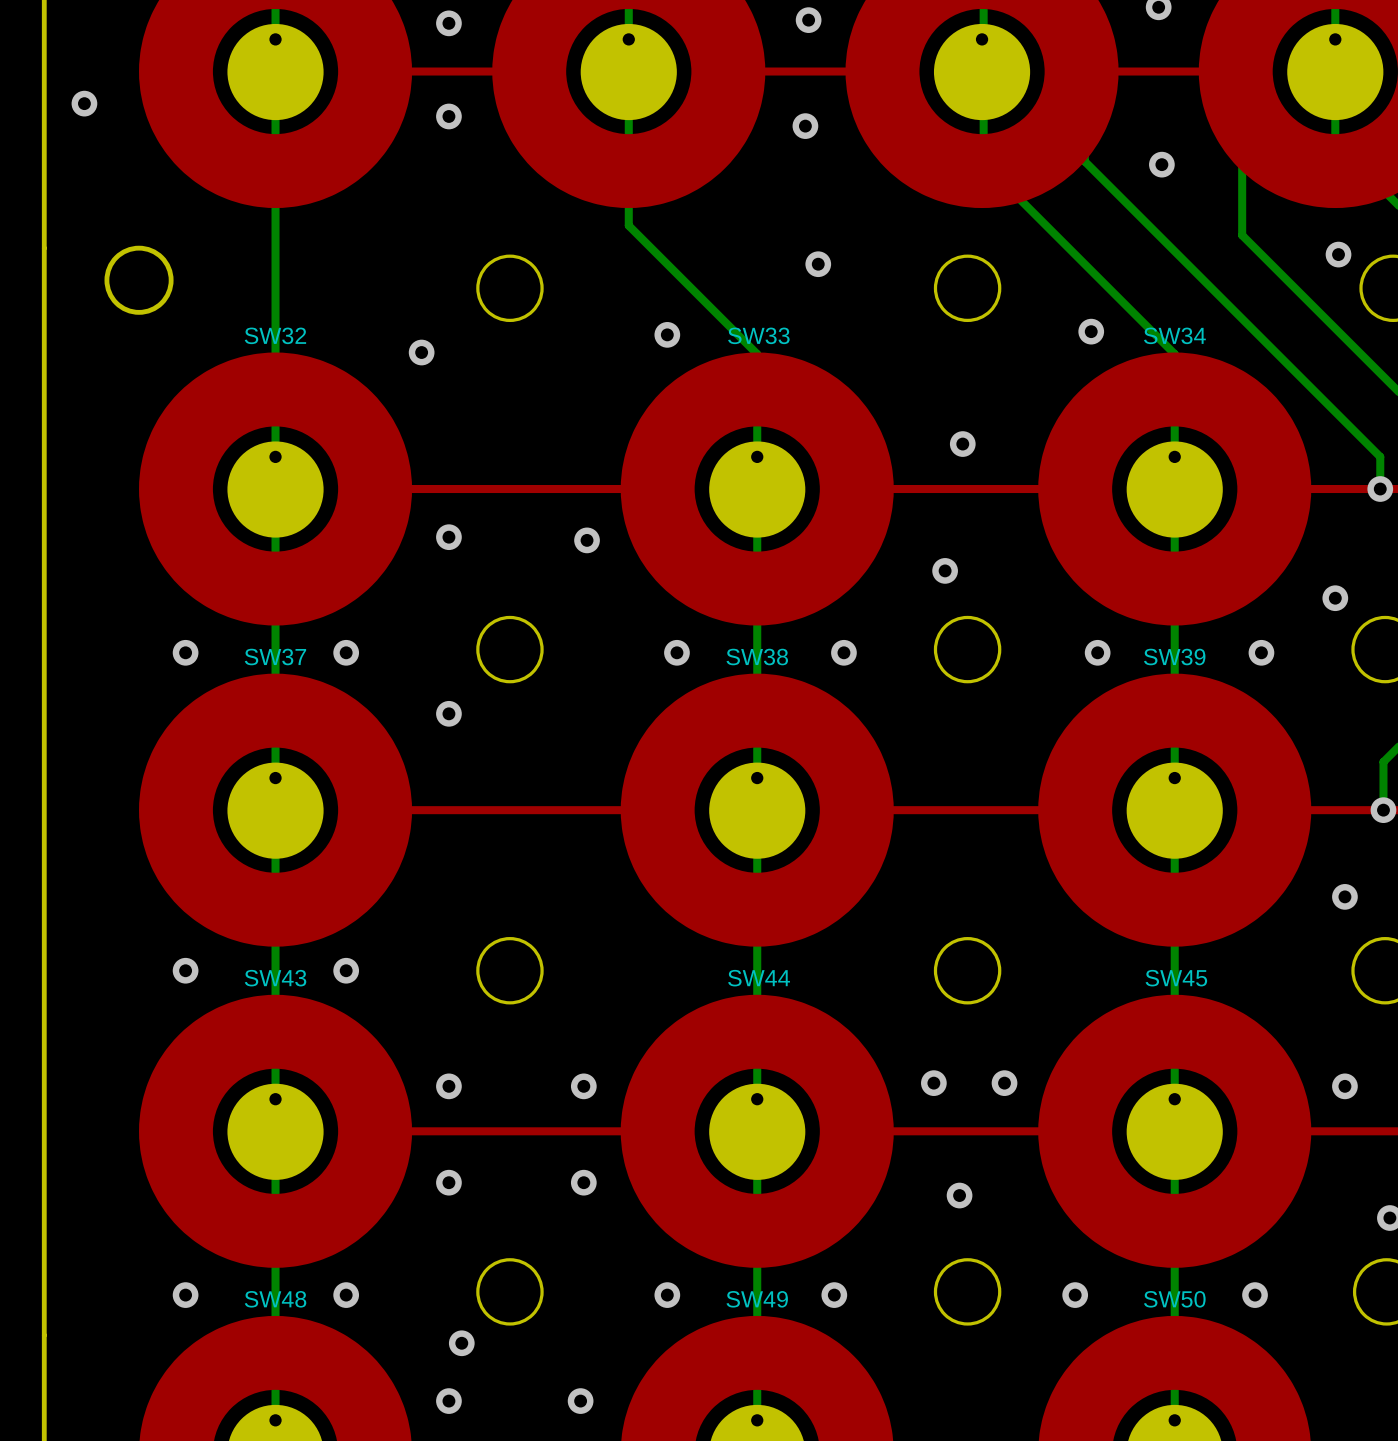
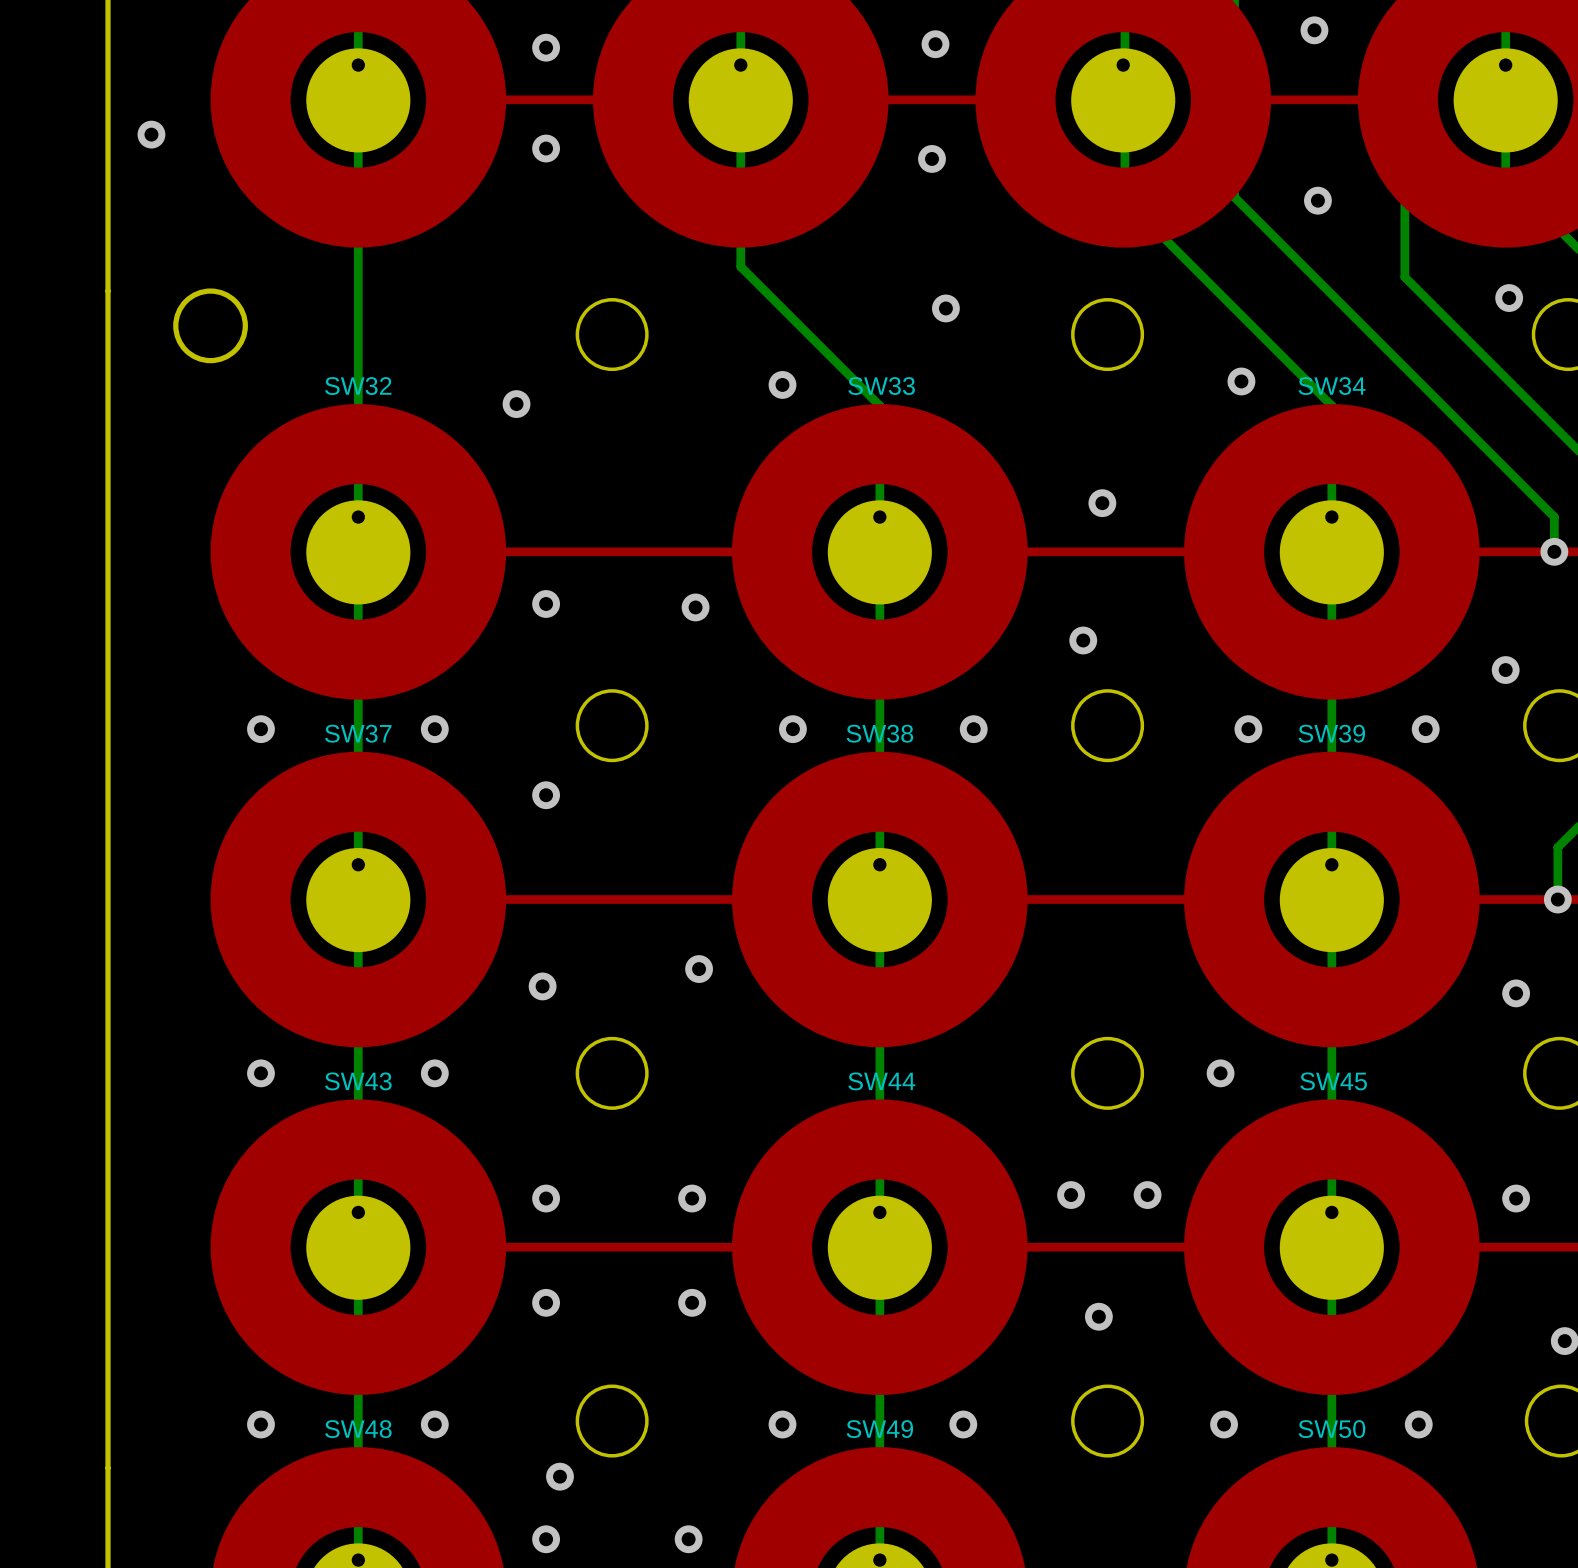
via: none -> (699, 969)
via: none -> (542, 986)
via: none -> (1220, 1073)

